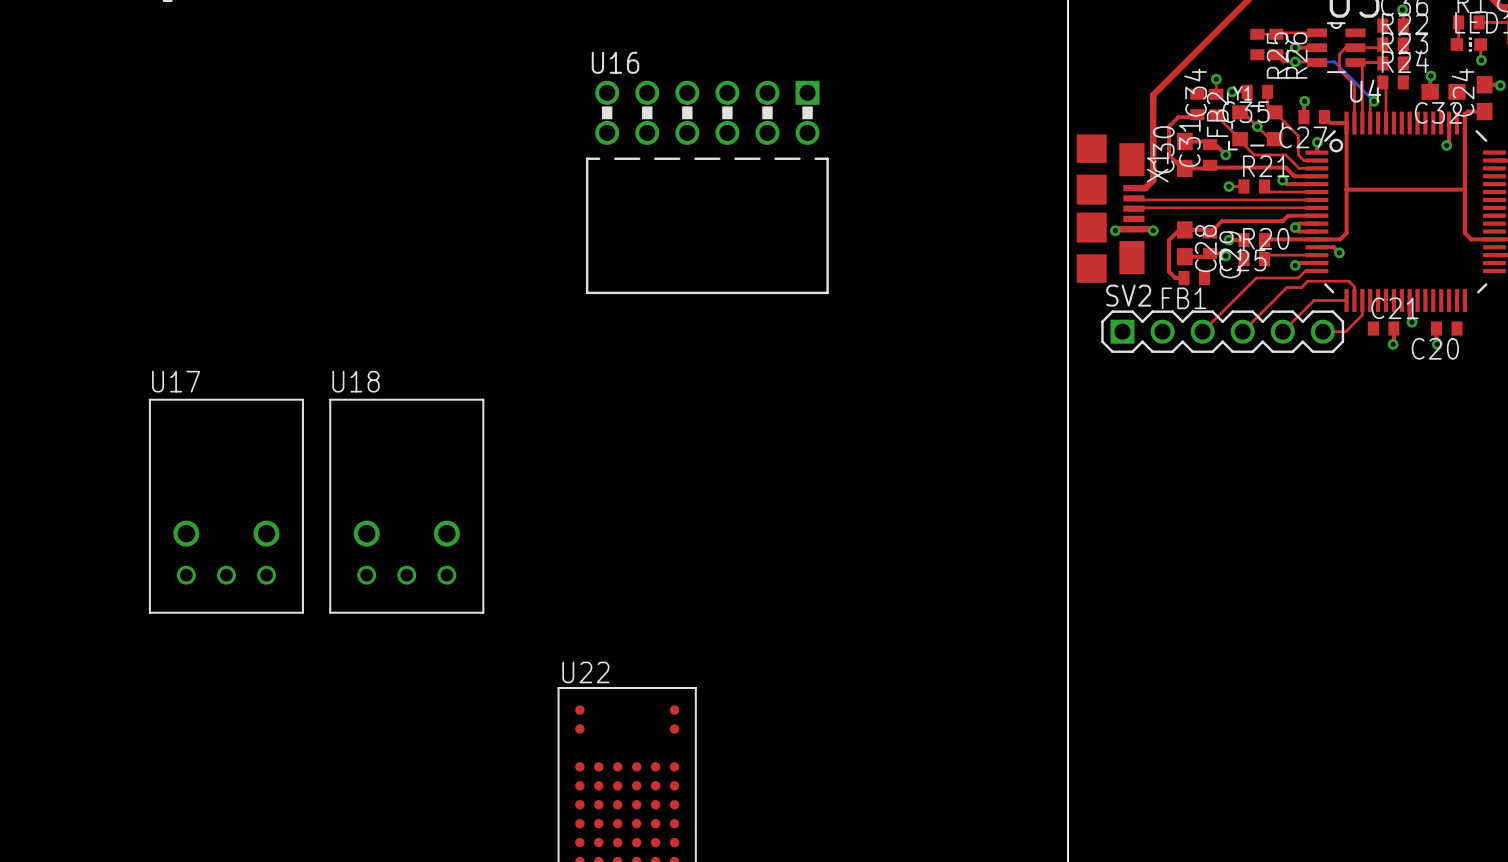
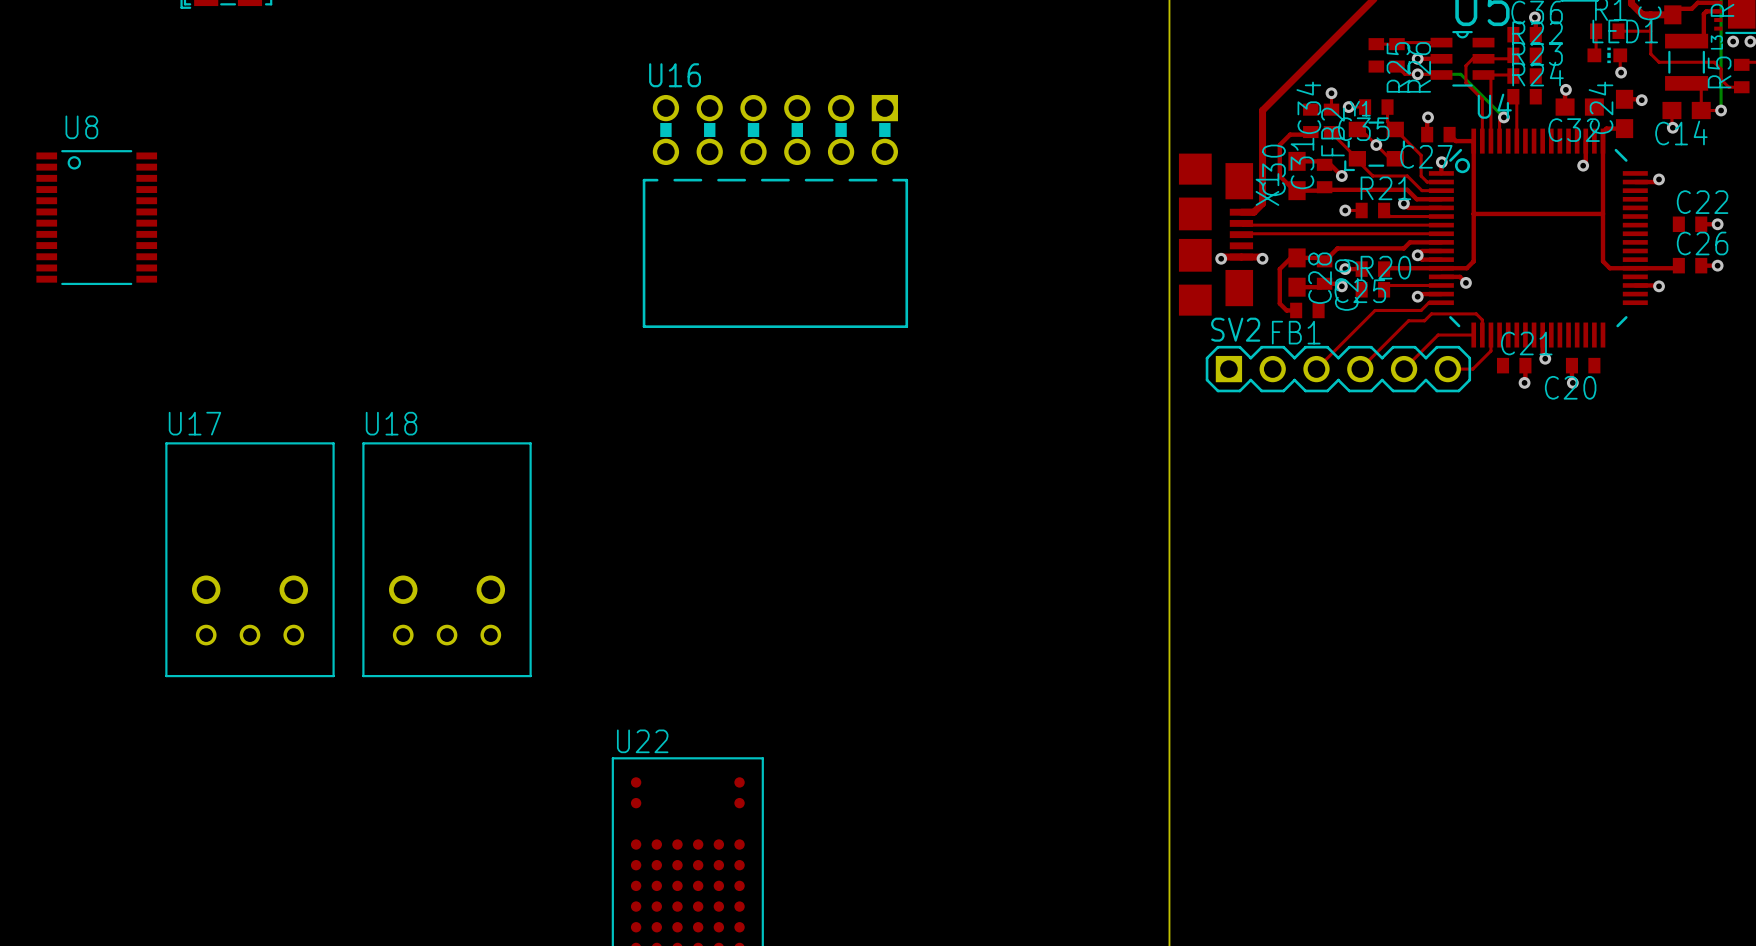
U8: none -> (96, 217)

